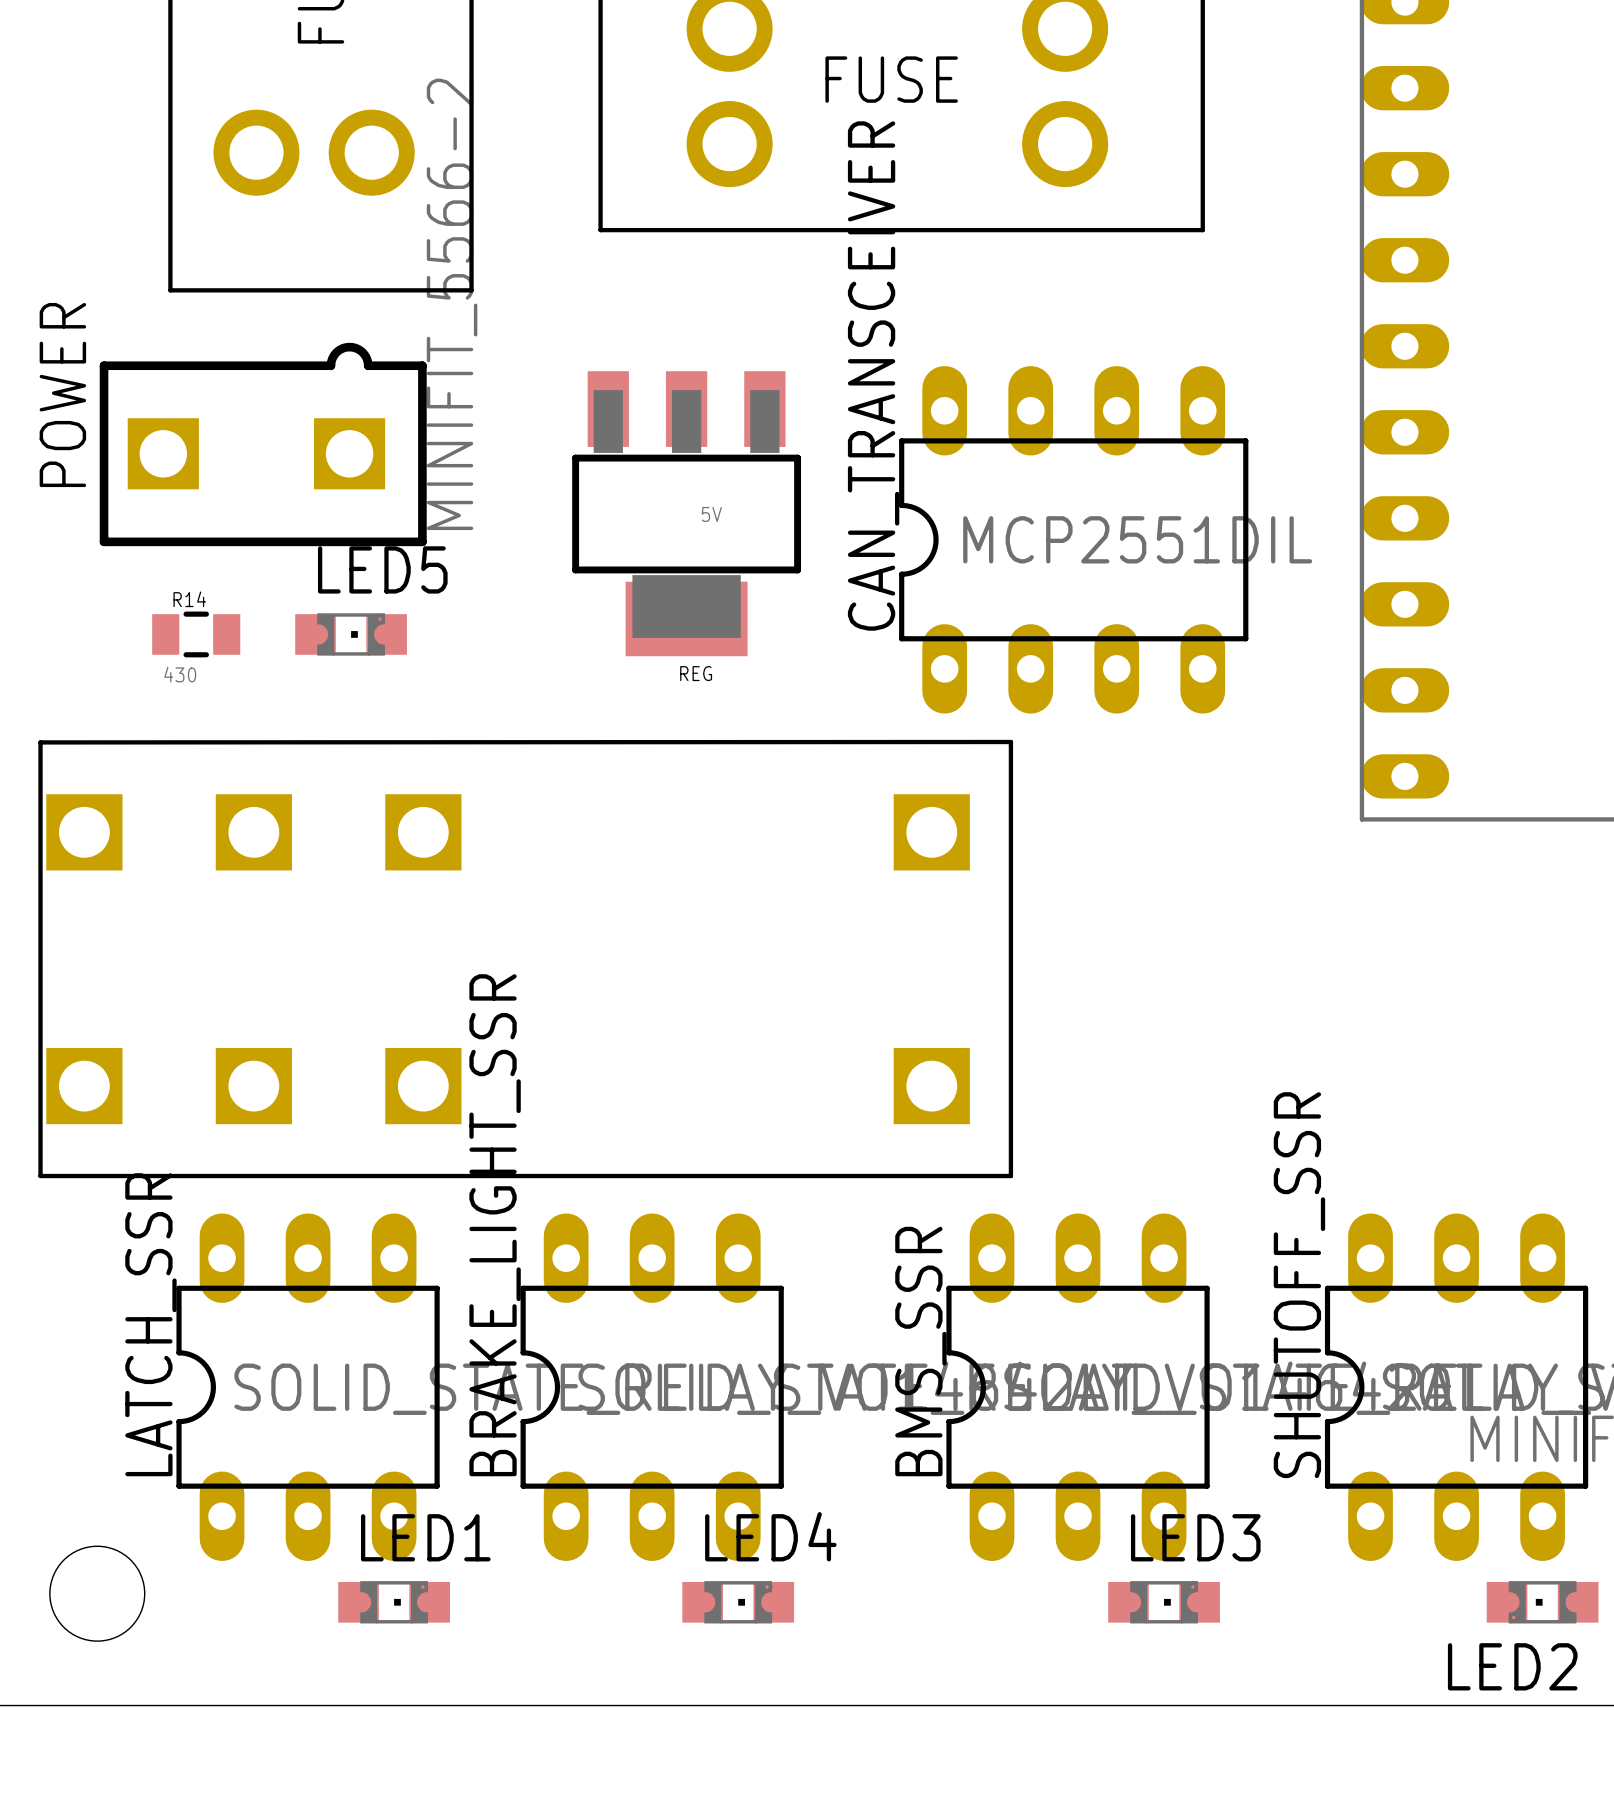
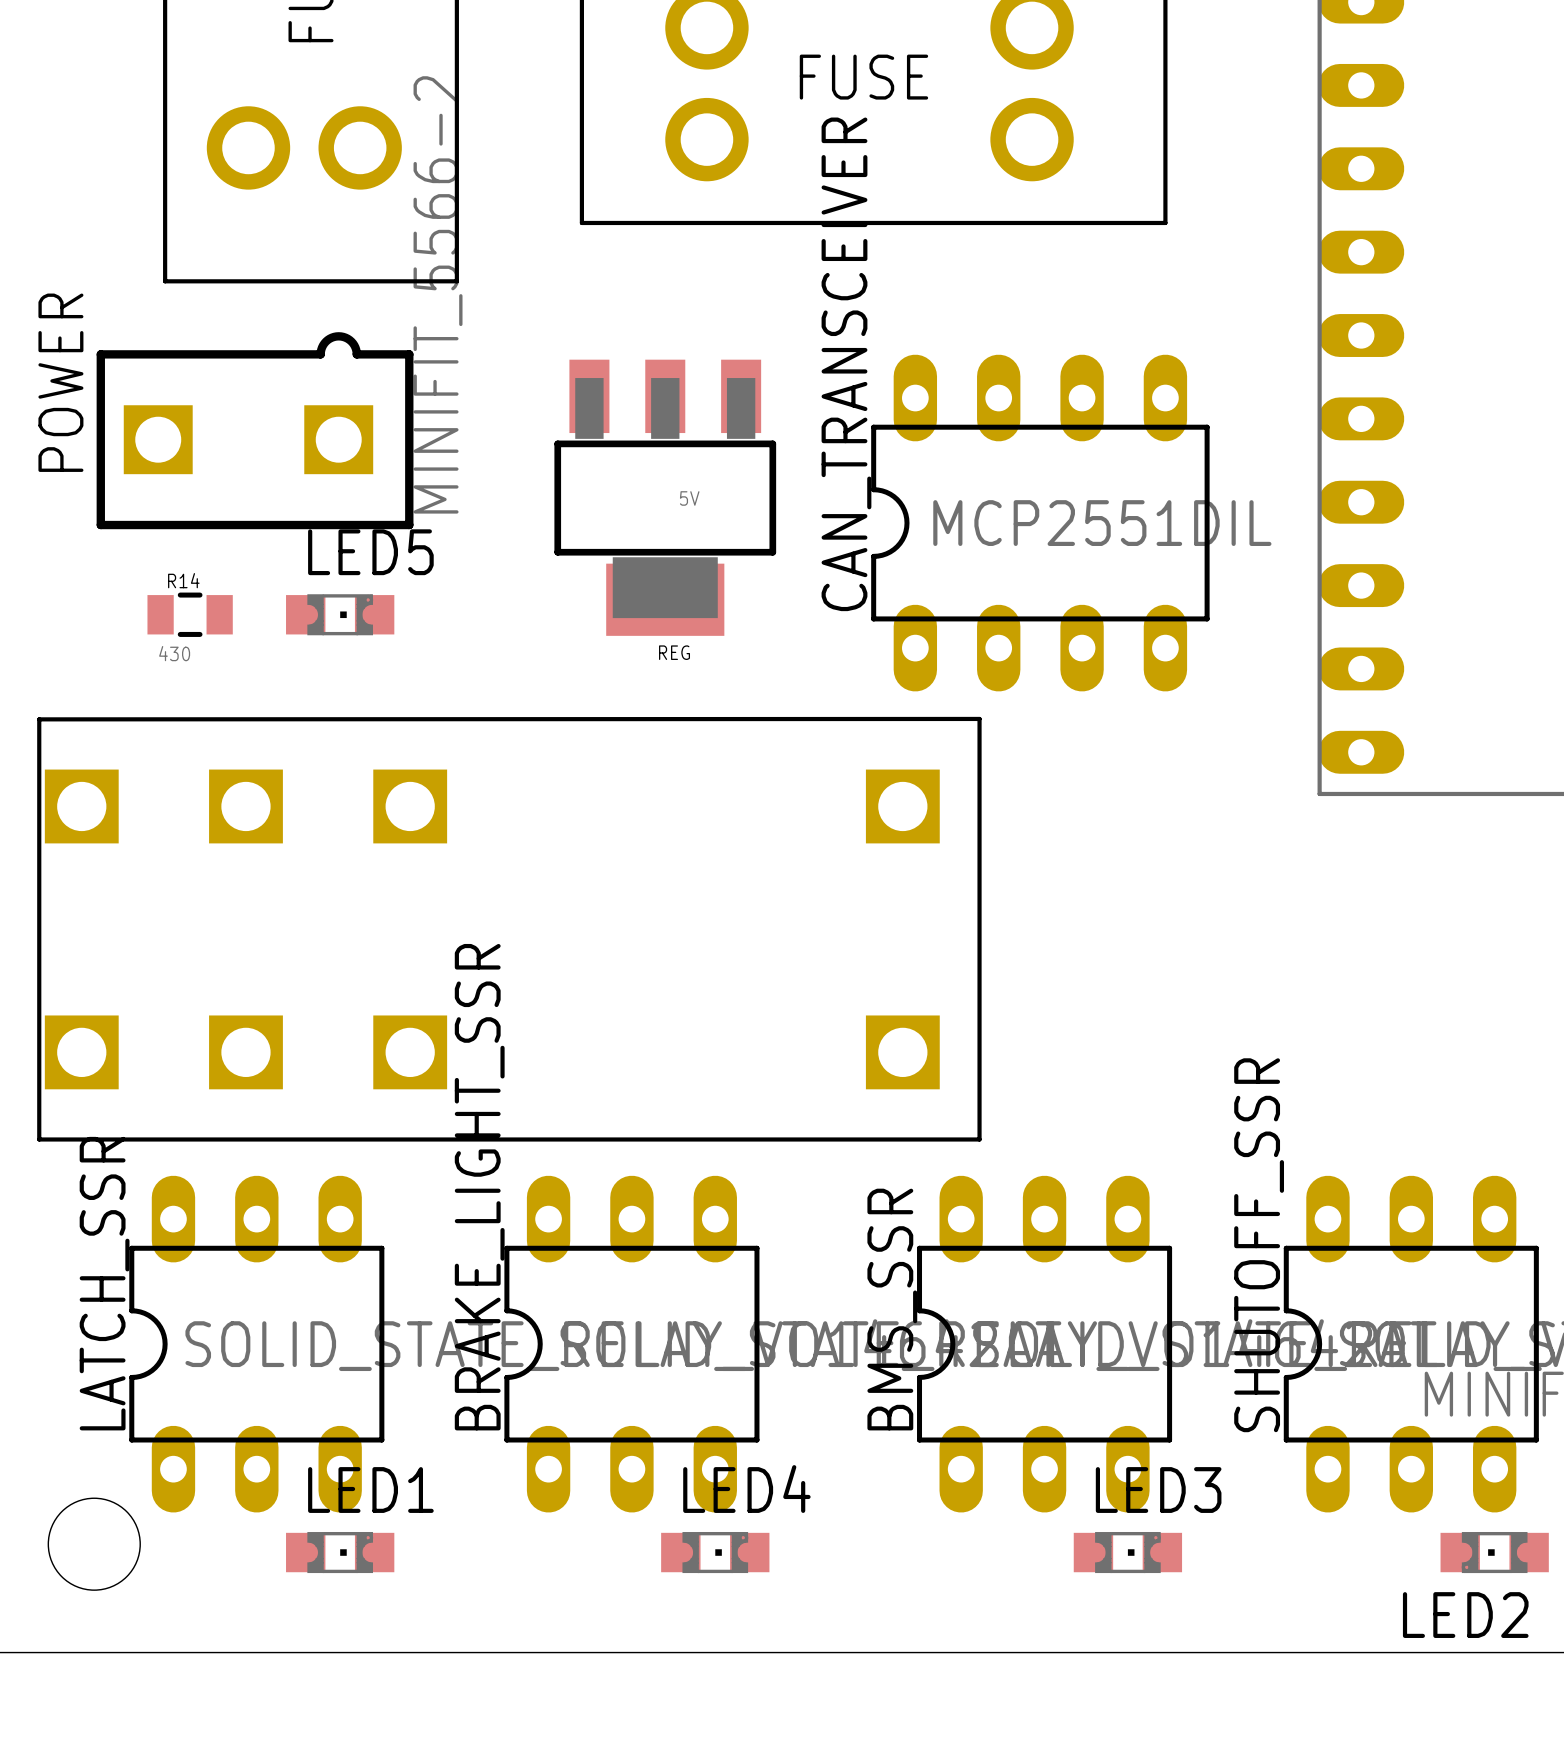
LATCH_SSR position: (308, 1387) -> (256, 1344)
LED1 position: (394, 1602) -> (340, 1552)

